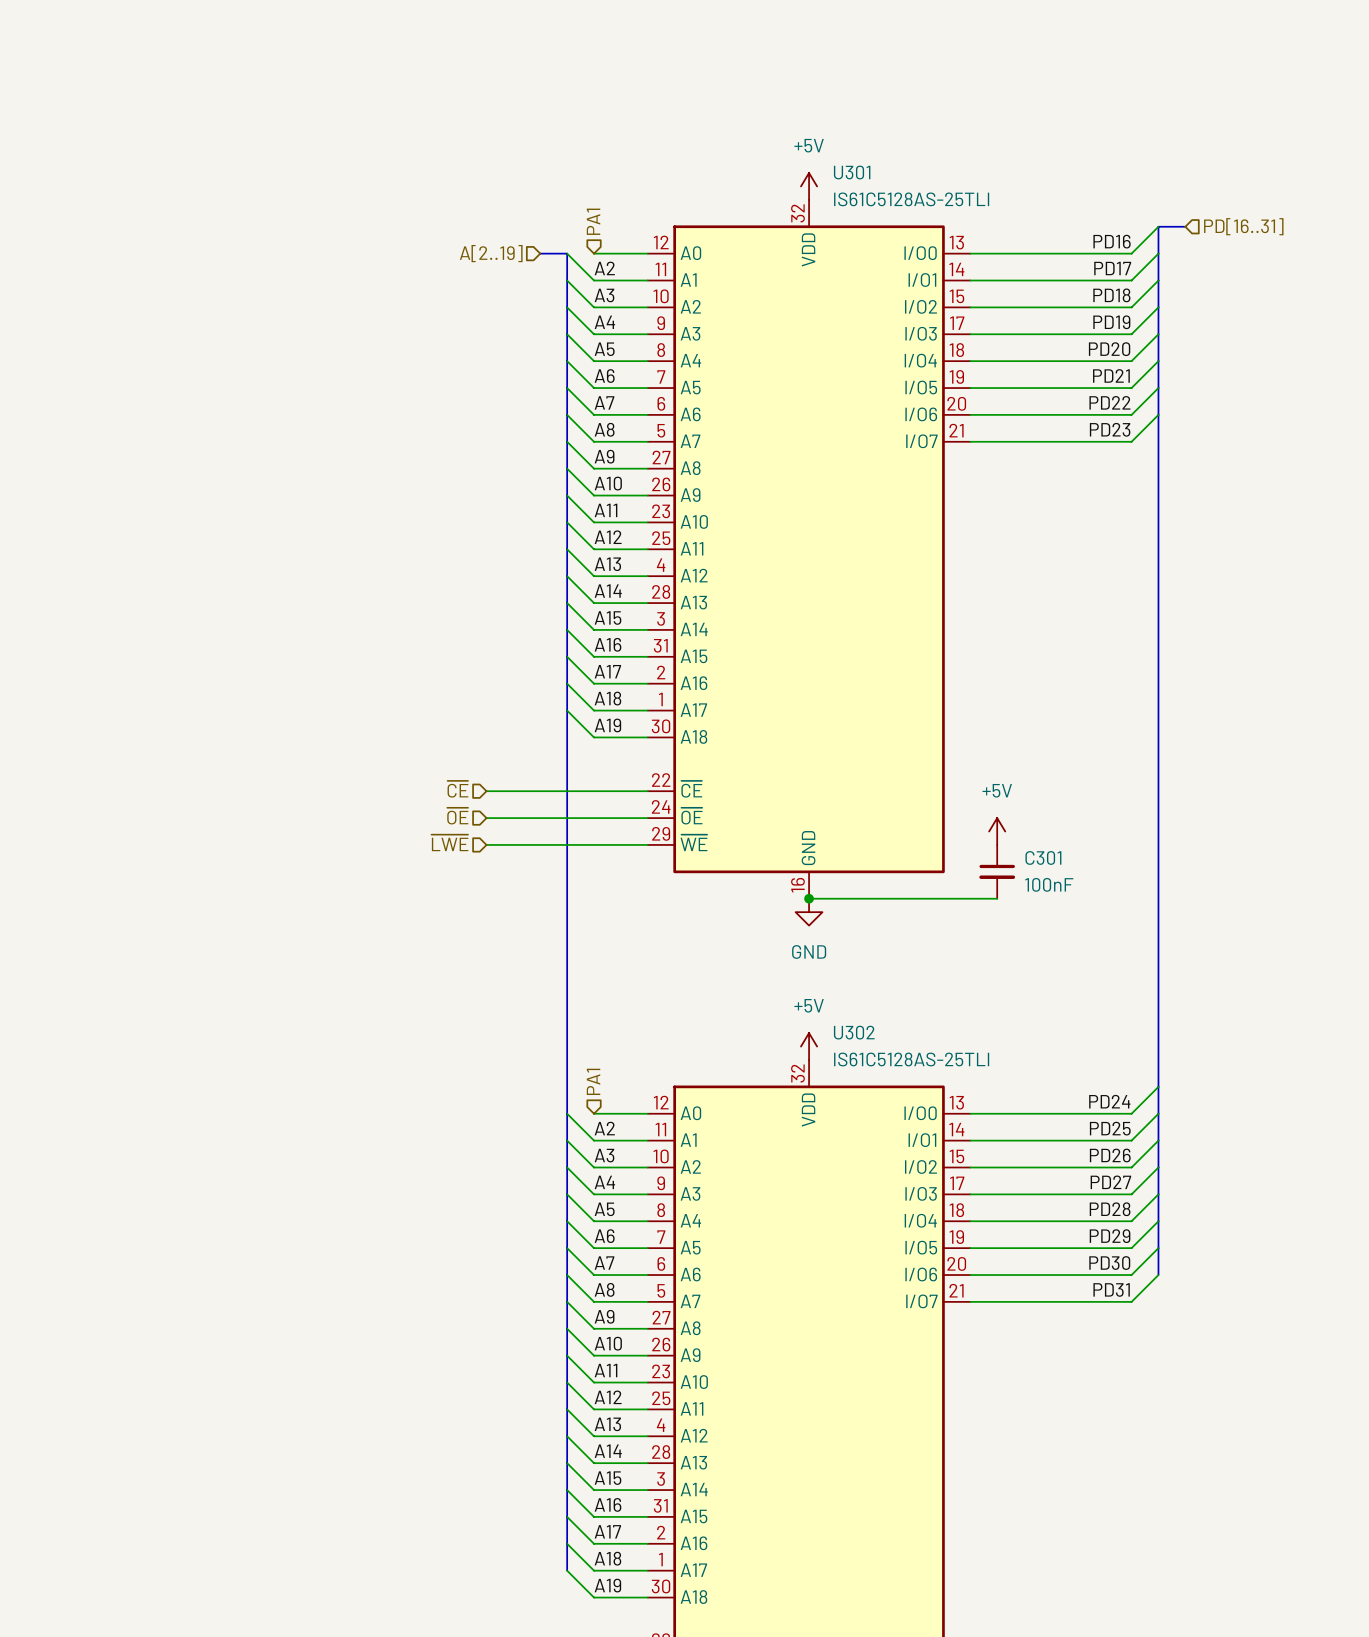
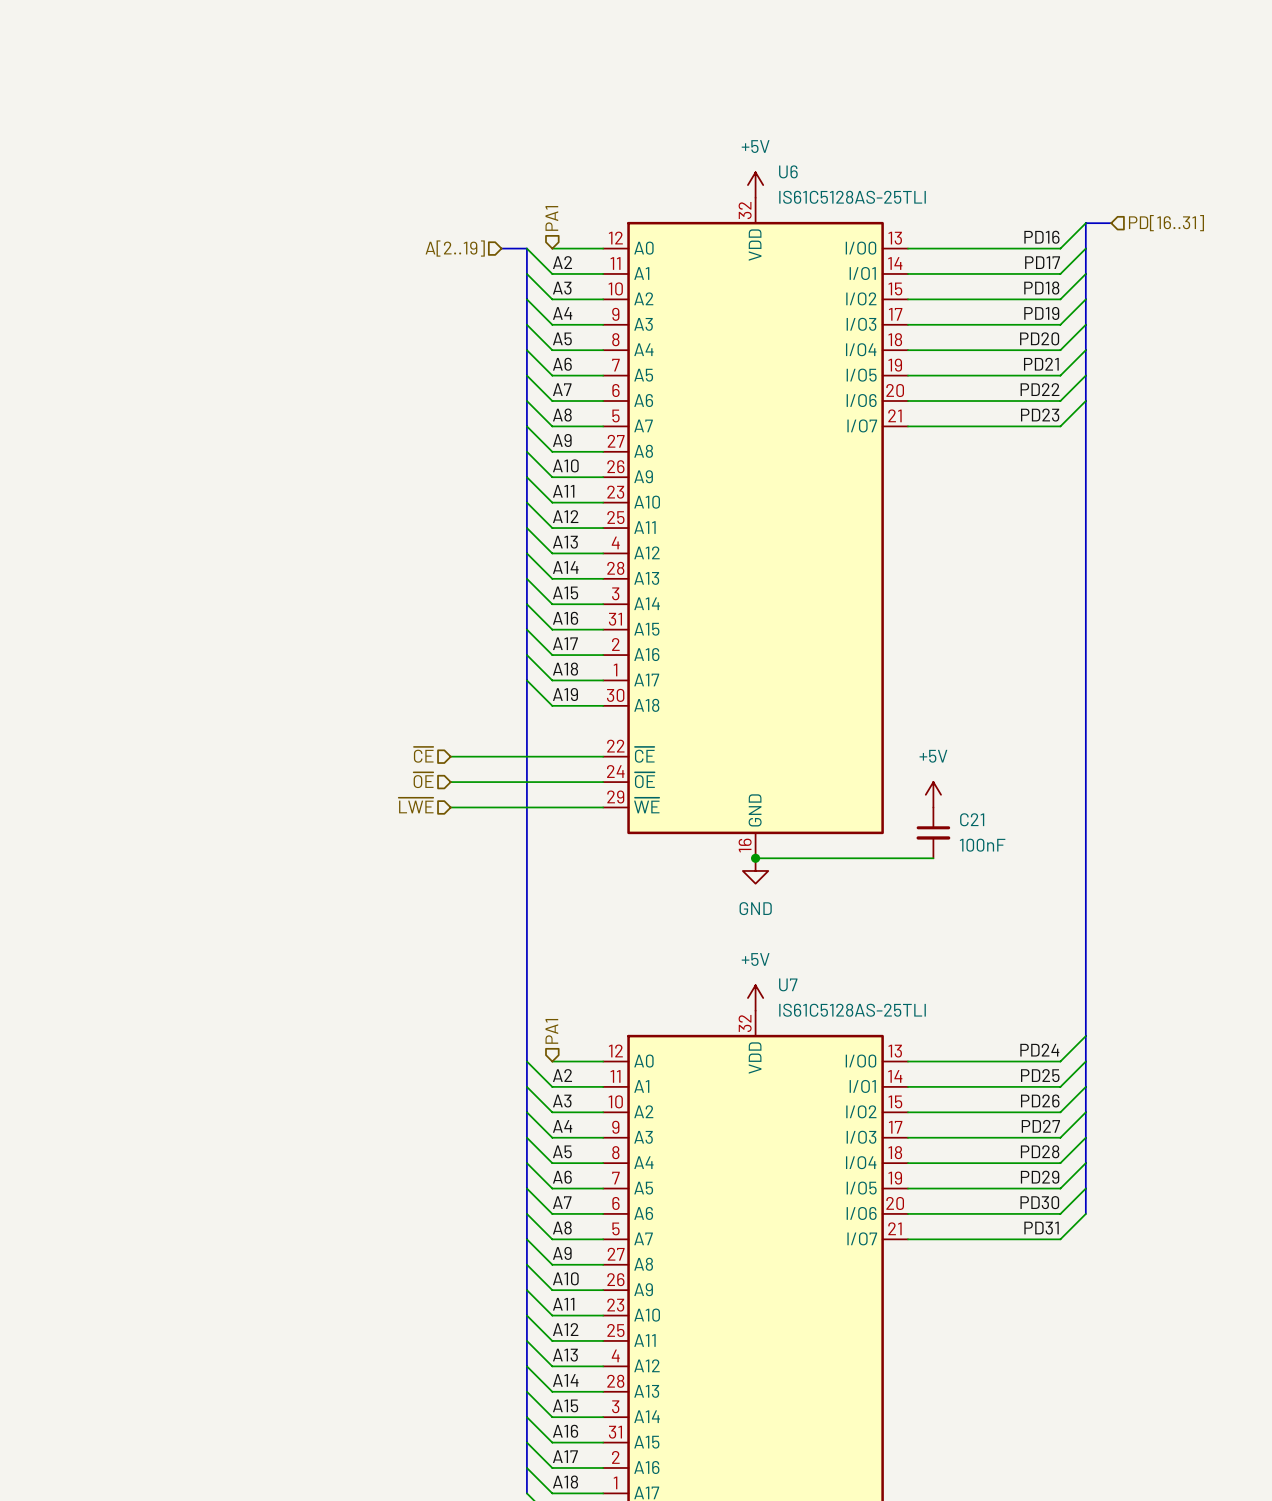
U301 name: U301 (852, 172) -> U6 (788, 171)
C301 name: C301 (1043, 857) -> C21 (972, 819)
U302 name: U302 (854, 1032) -> U7 (788, 984)

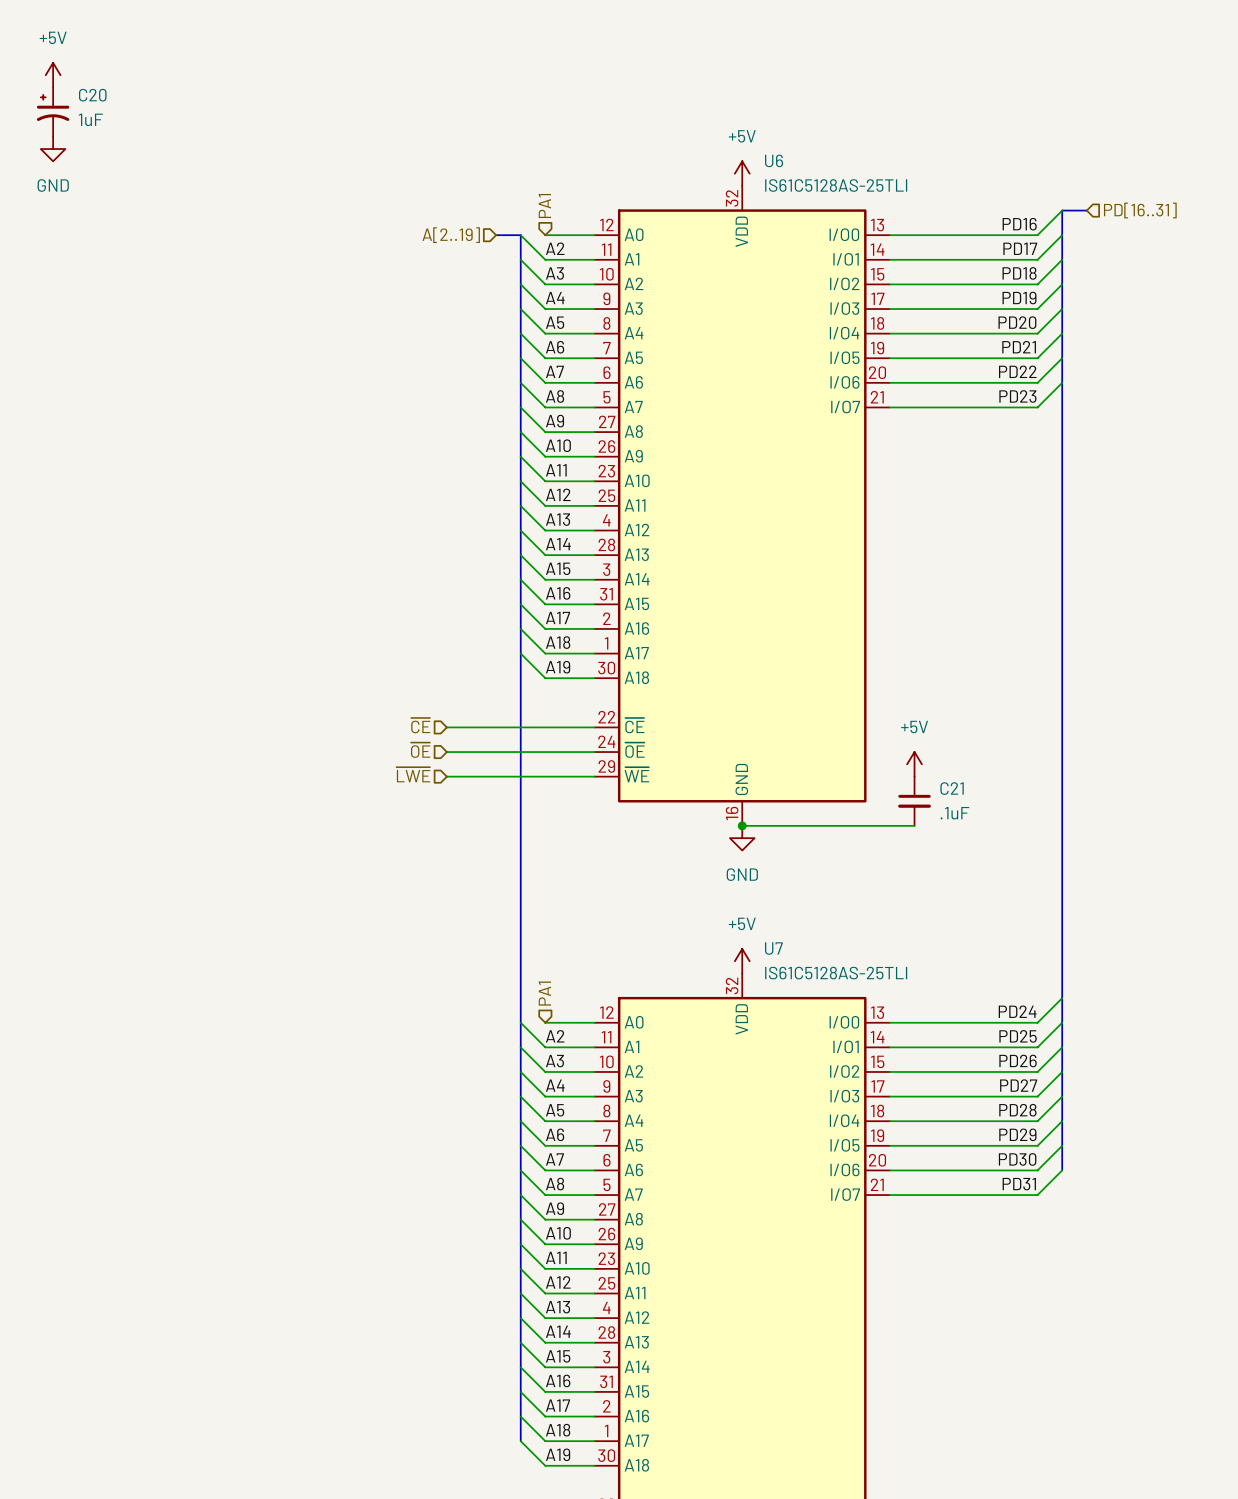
power symbol: none -> +5V (53, 75)
C20: none -> 1uF (53, 112)
power symbol: none -> GND (53, 149)
C21 value: 100nF (982, 845) -> .1uF (954, 813)

